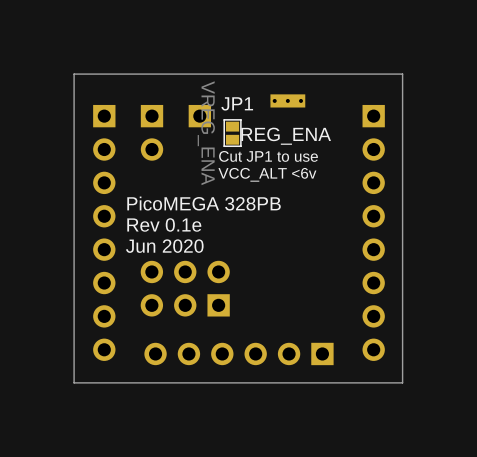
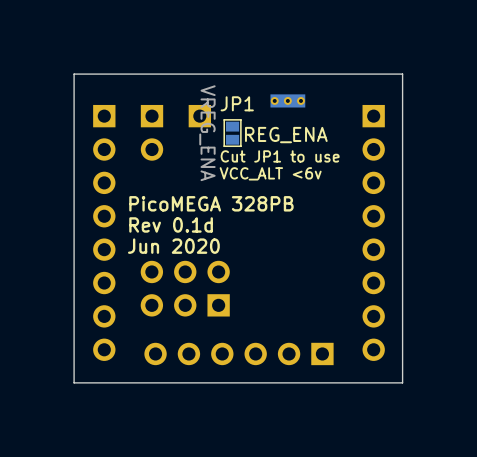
text: Rev 0.1e (164, 224) -> Rev 0.1d (171, 224)

